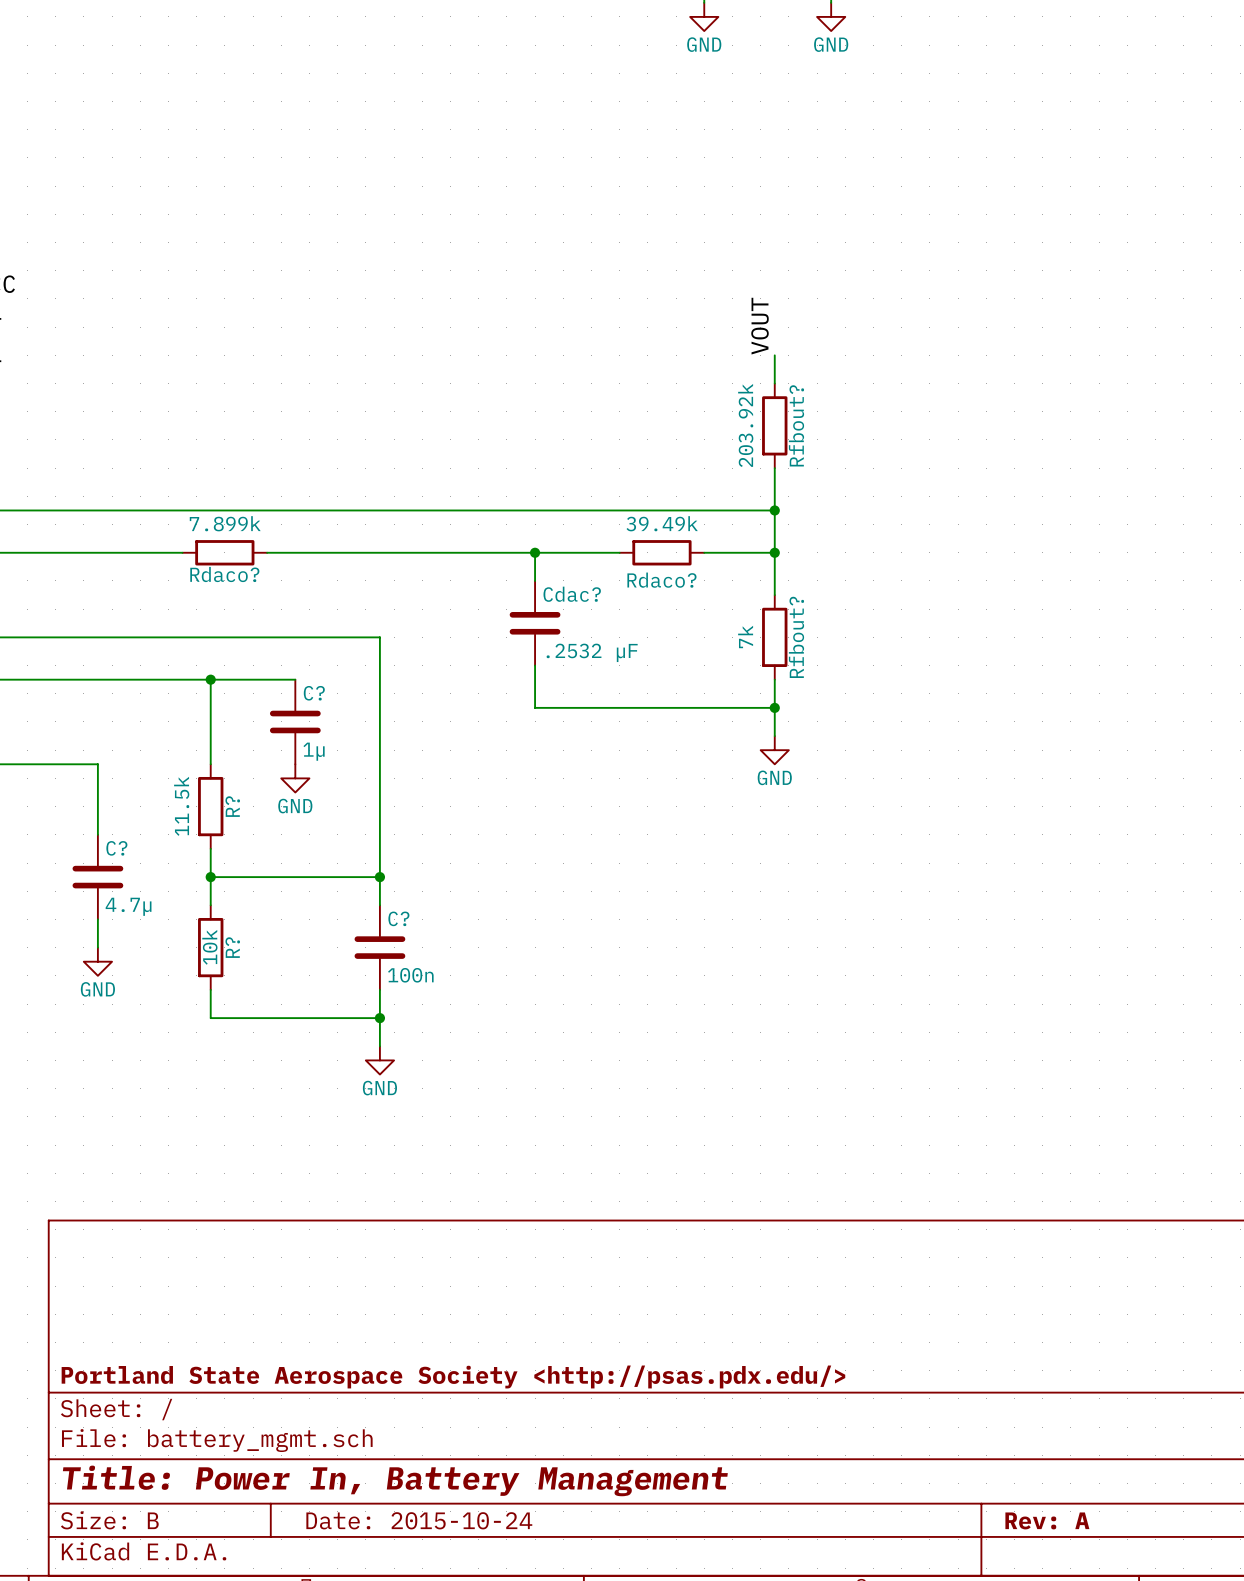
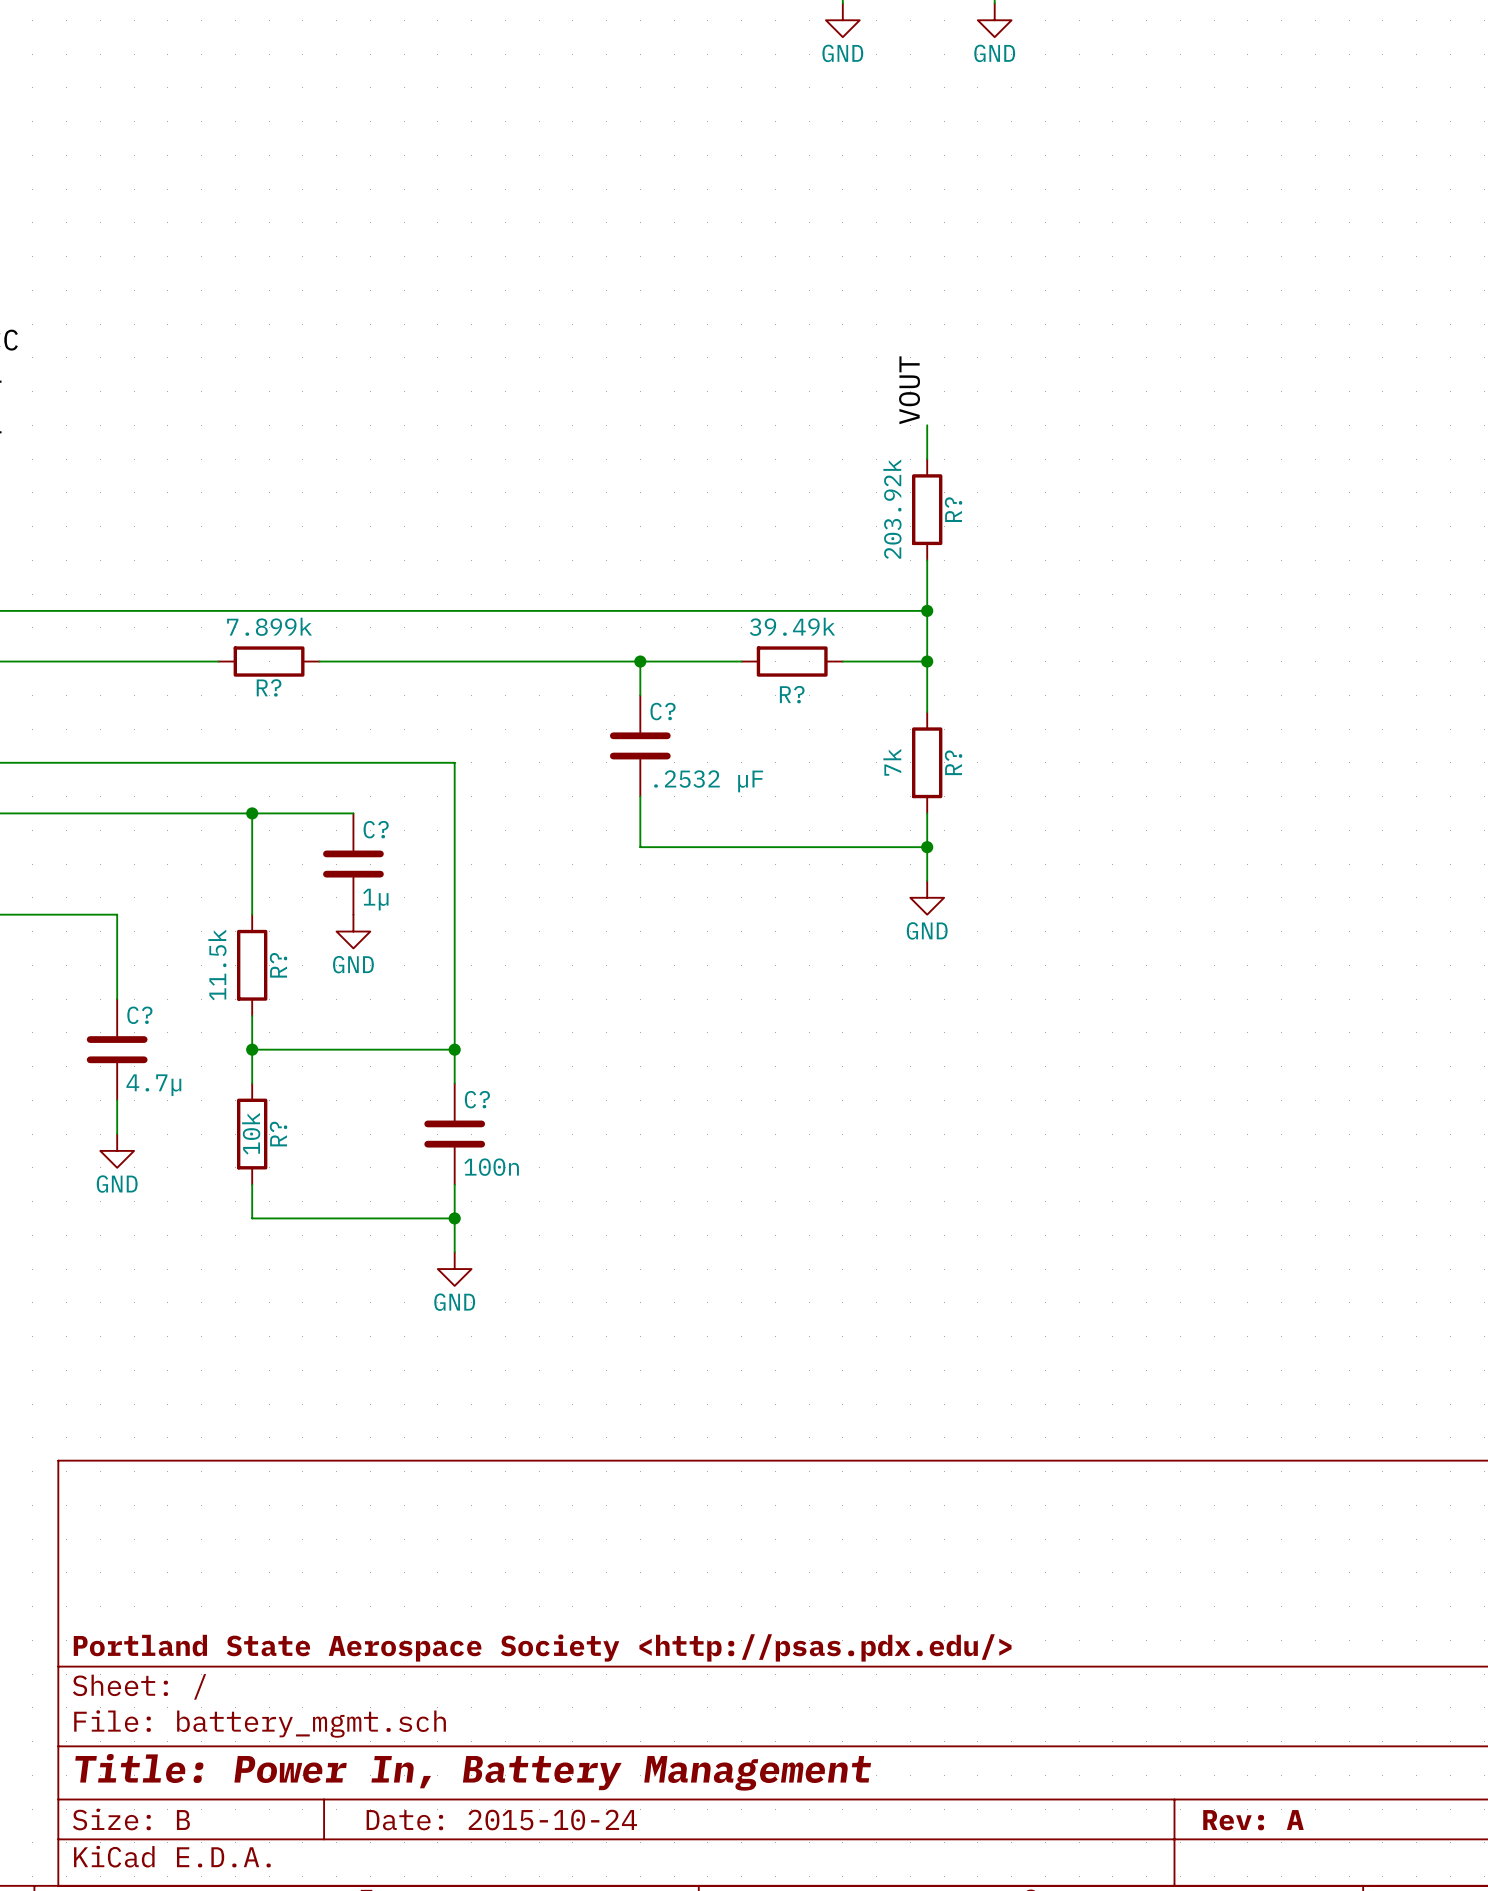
Rfbout? name: Rfbout? (796, 425) -> R? (953, 509)
Rdaco? name: Rdaco? (224, 574) -> R? (269, 687)
Rdaco? name: Rdaco? (661, 580) -> R? (792, 694)
Cdac? name: Cdac? (572, 594) -> C? (663, 711)
Rfbout? name: Rfbout? (796, 637) -> R? (953, 762)

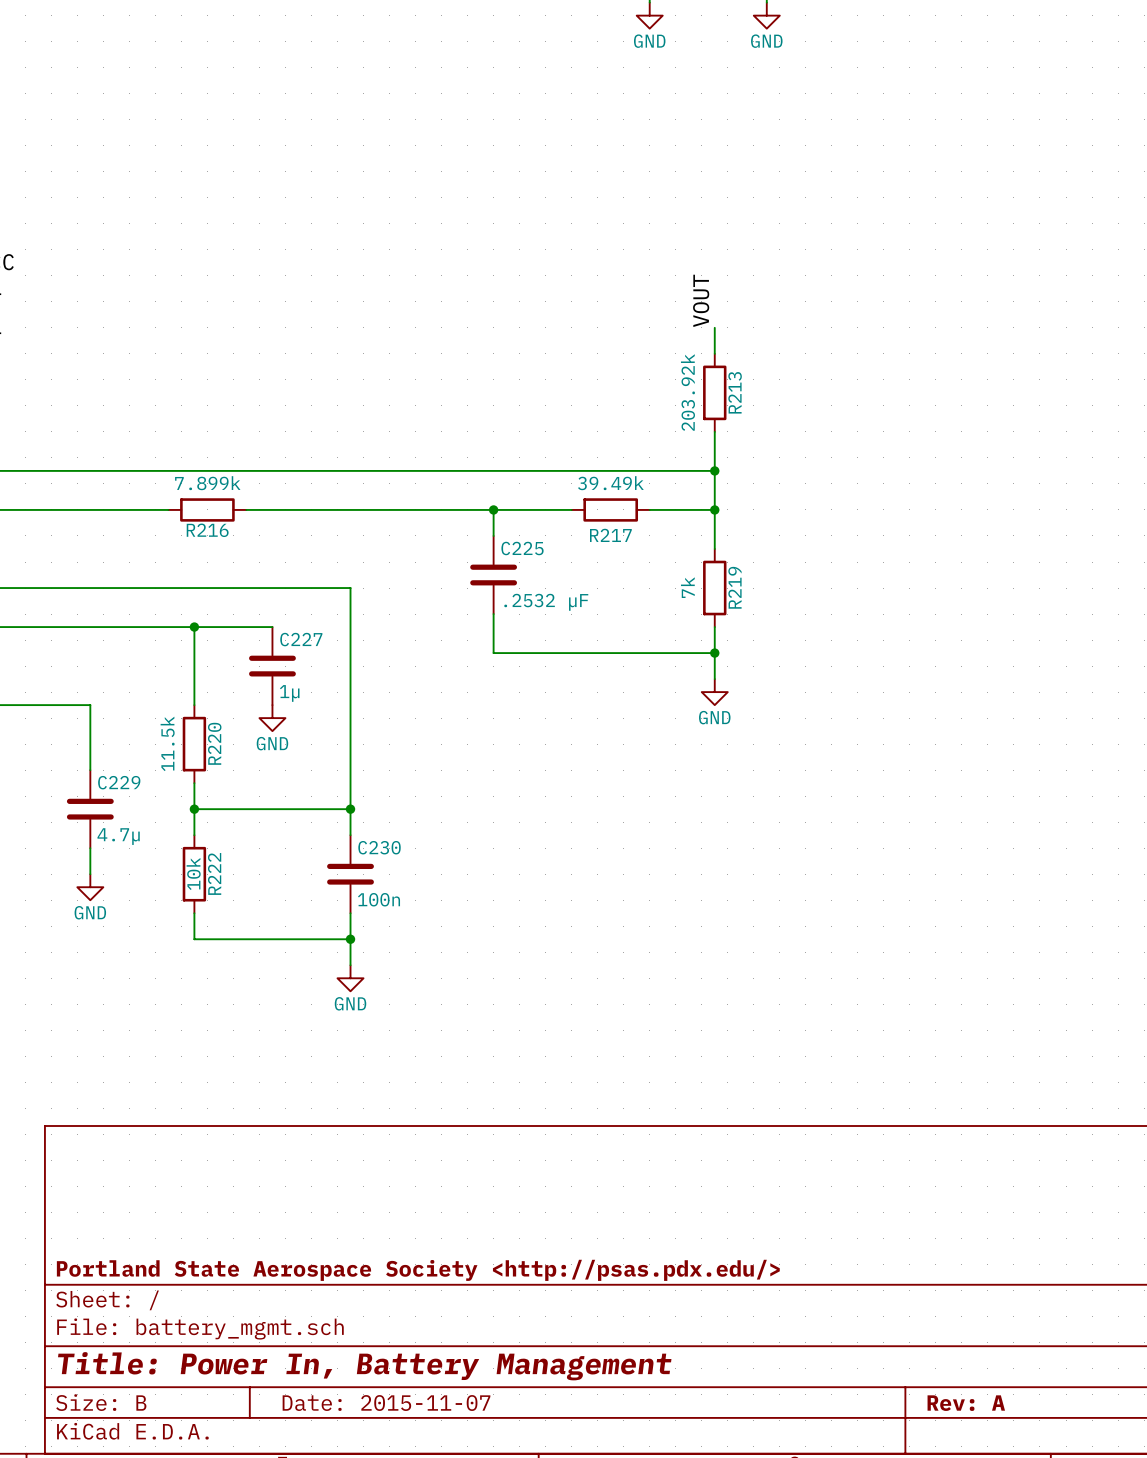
R? name: R? (953, 509) -> R213 (735, 392)
R? name: R? (269, 687) -> R216 (207, 530)
R? name: R? (792, 694) -> R217 (610, 535)
C? name: C? (663, 711) -> C225 (522, 548)
R? name: R? (953, 762) -> R219 (734, 587)
C? name: C? (376, 829) -> C227 (301, 639)
R? name: R? (278, 965) -> R220 (214, 743)
C? name: C? (139, 1015) -> C229 (119, 782)
C? name: C? (477, 1099) -> C230 (379, 847)
R? name: R? (278, 1134) -> R222 (214, 873)
title block: Date: 2015-10-24 (501, 1820) -> Date: 2015-11-07 (386, 1403)

